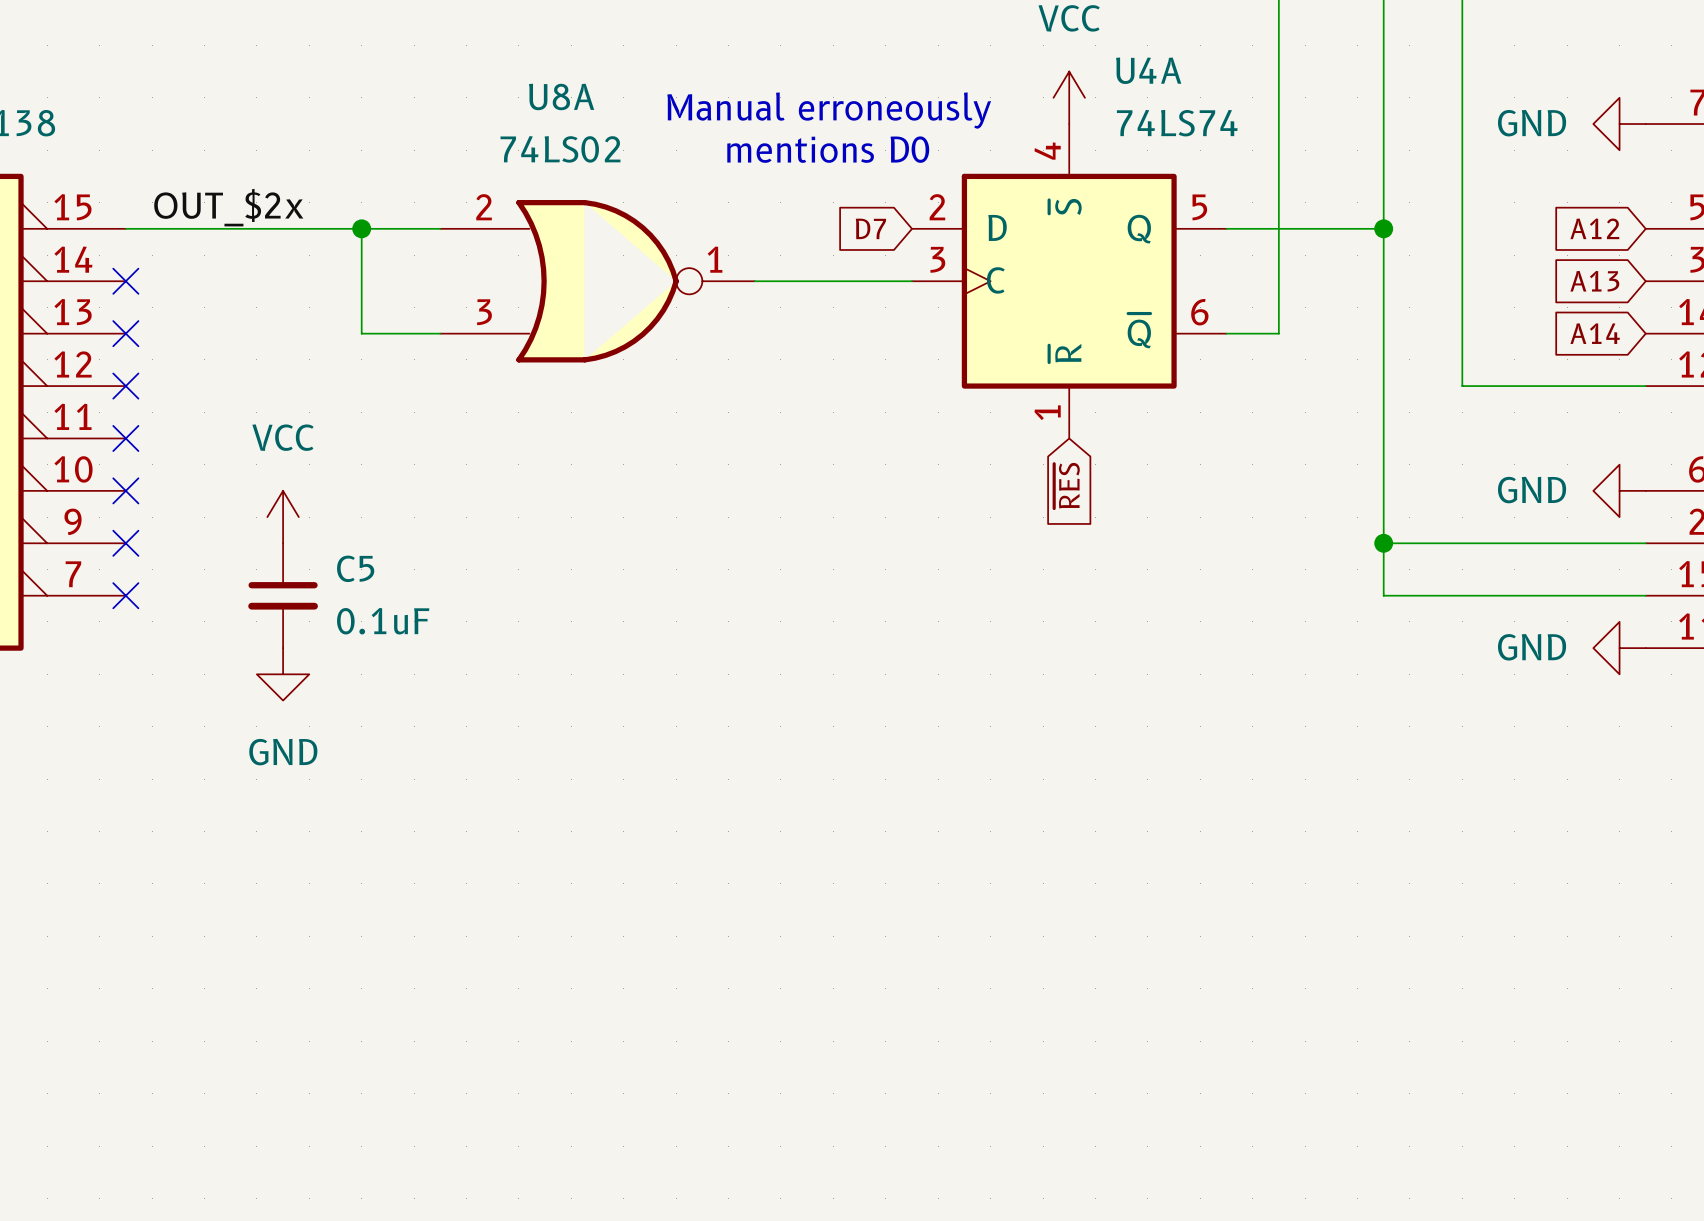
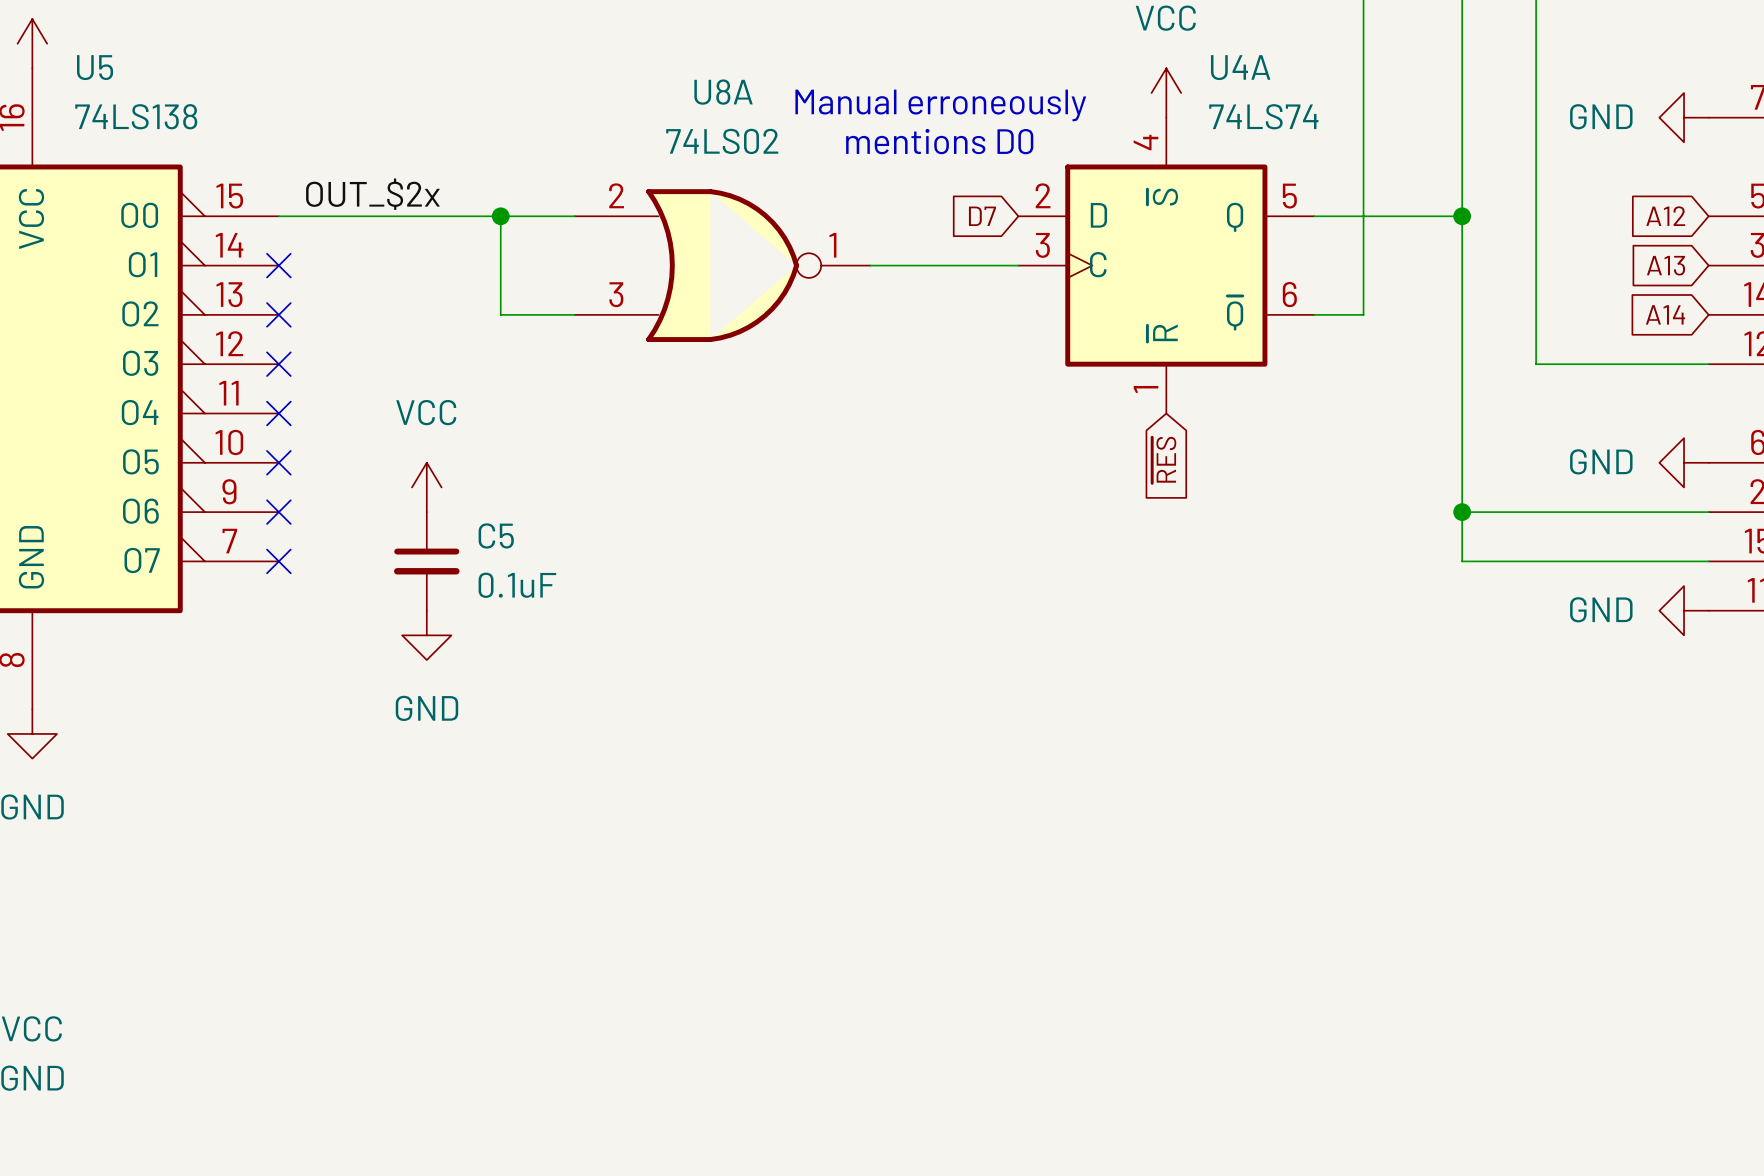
U8A name position: U8A (561, 96) -> U8A (723, 92)
U8A value position: 74LS02 (560, 149) -> 74LS02 (722, 141)

